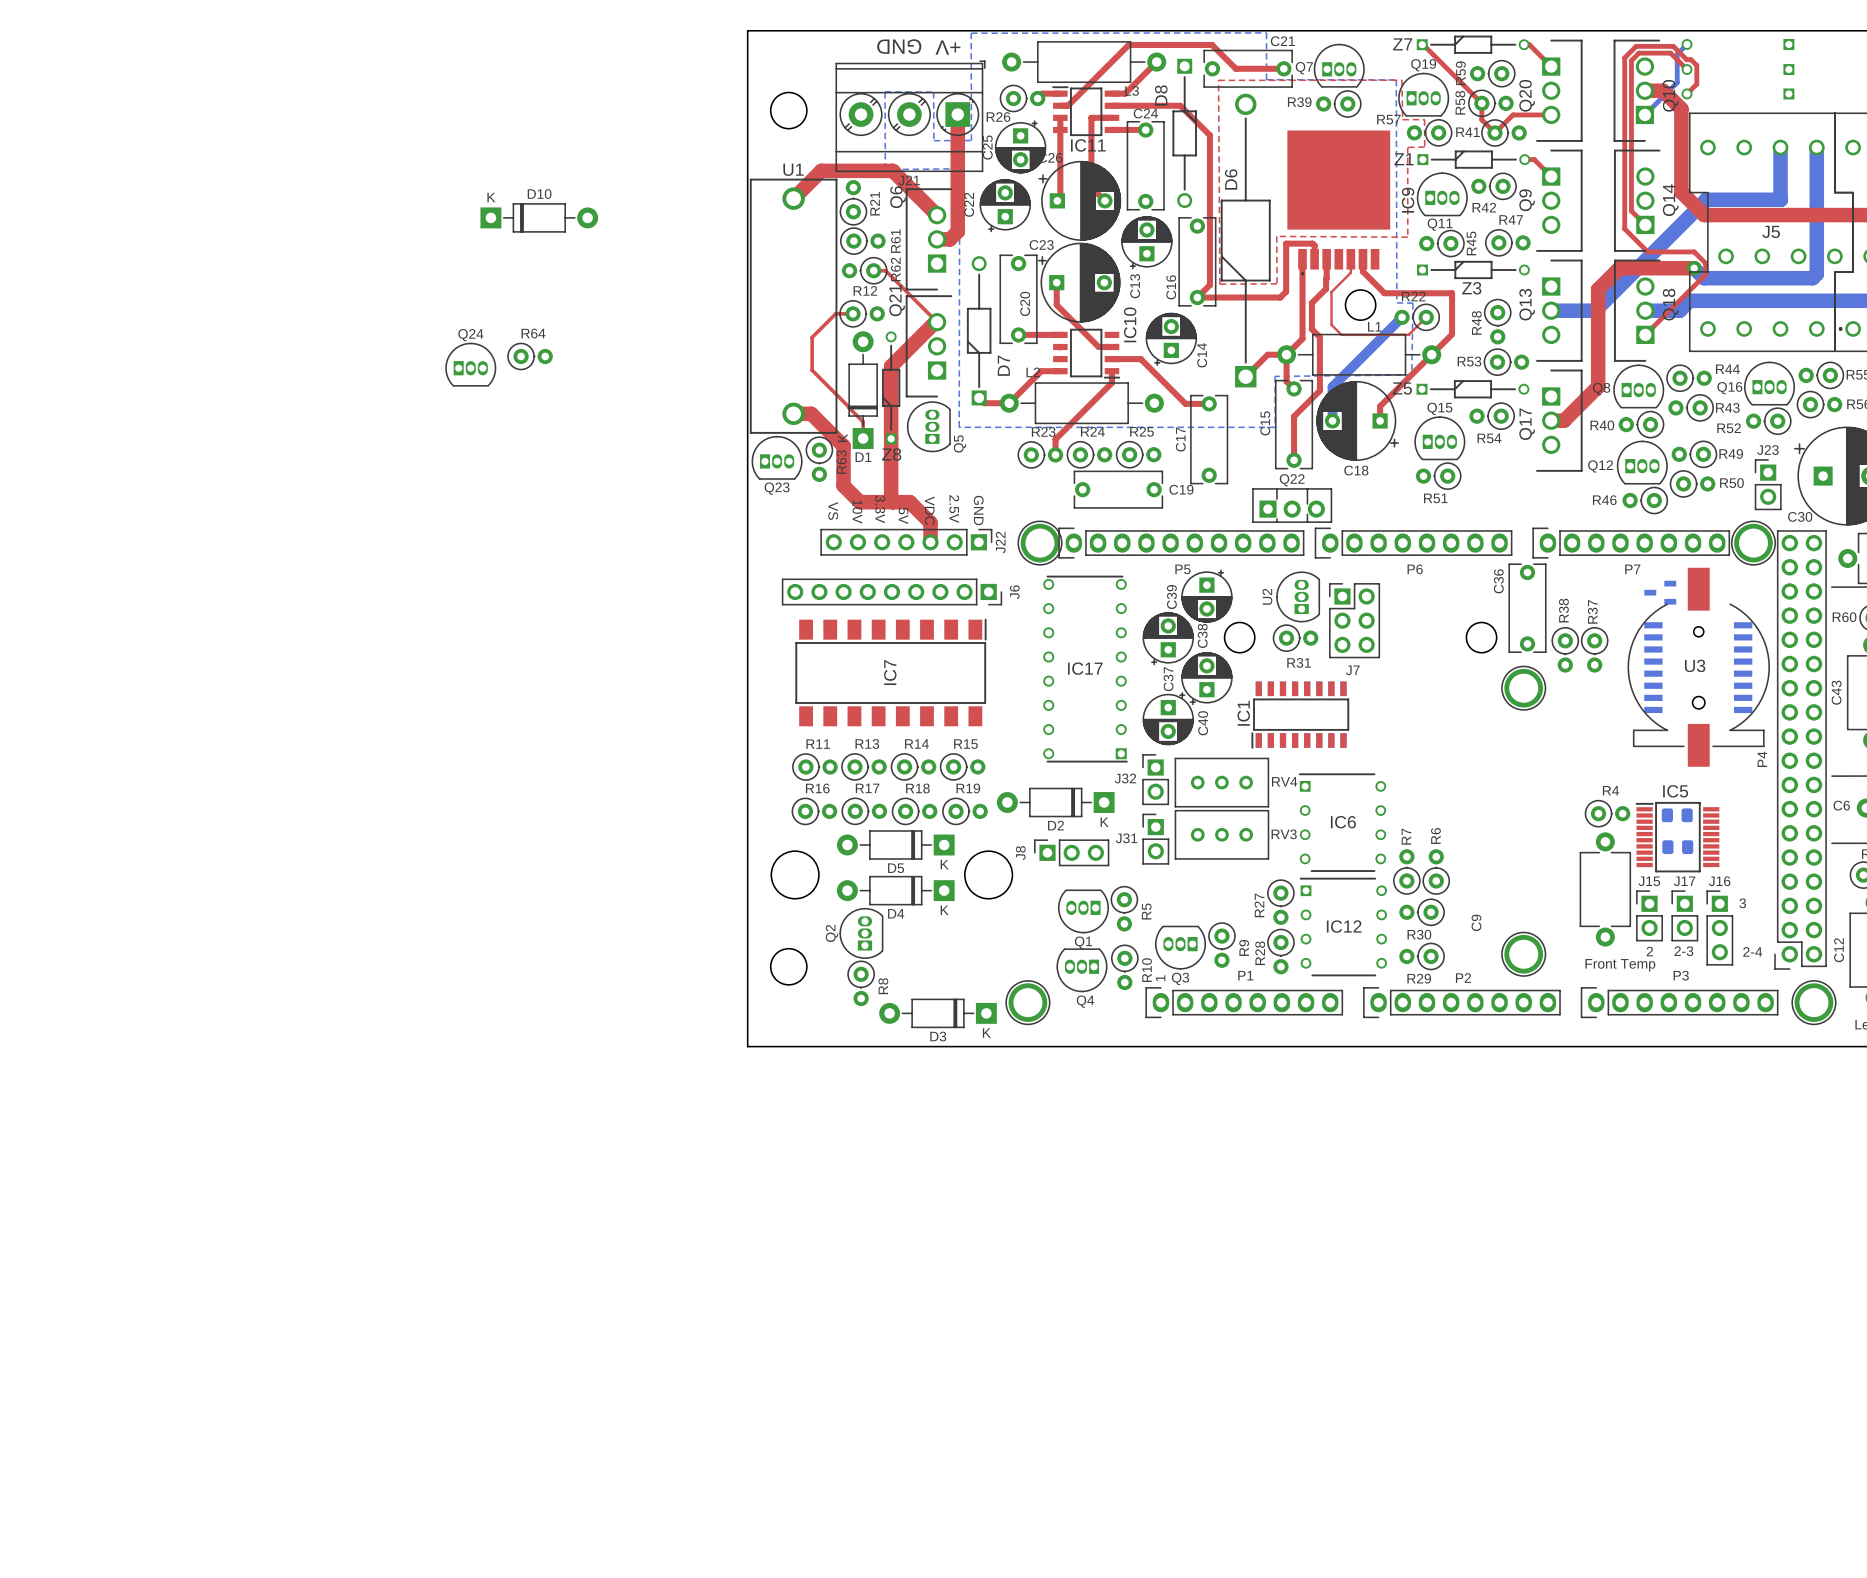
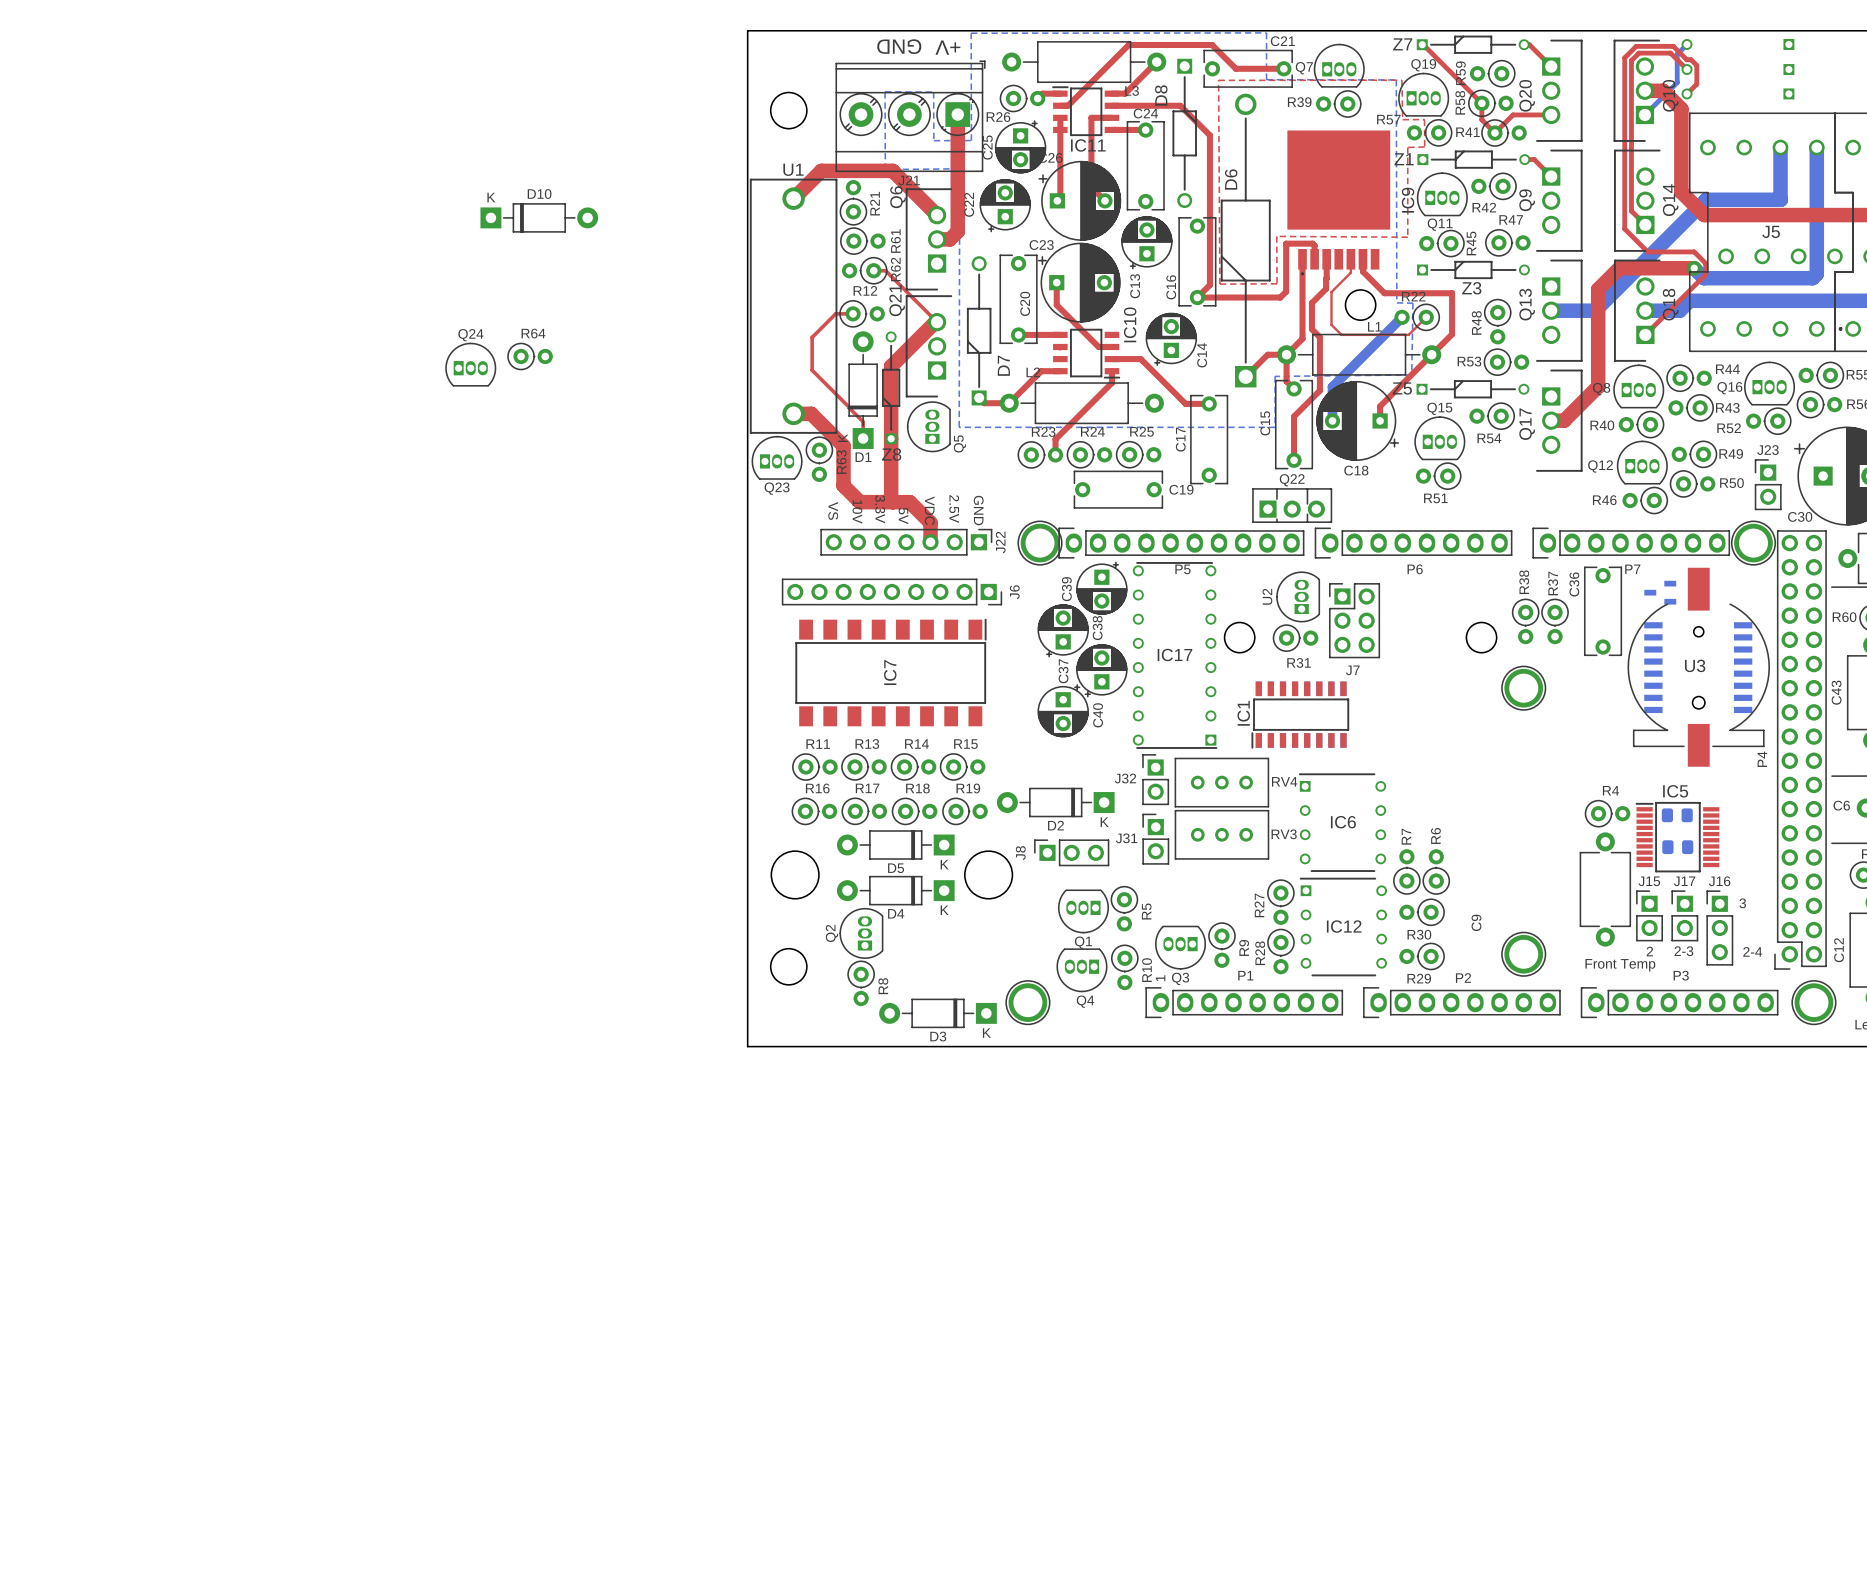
C39 position: (1206, 596) -> (1101, 588)
C36 position: (1527, 608) -> (1603, 611)
C38 position: (1168, 638) -> (1063, 630)
R38 position: (1565, 649) -> (1525, 621)
R37 position: (1594, 649) -> (1555, 621)
IC17 position: (1085, 669) -> (1175, 655)
C37 position: (1206, 678) -> (1101, 670)
C40 position: (1168, 718) -> (1063, 710)

